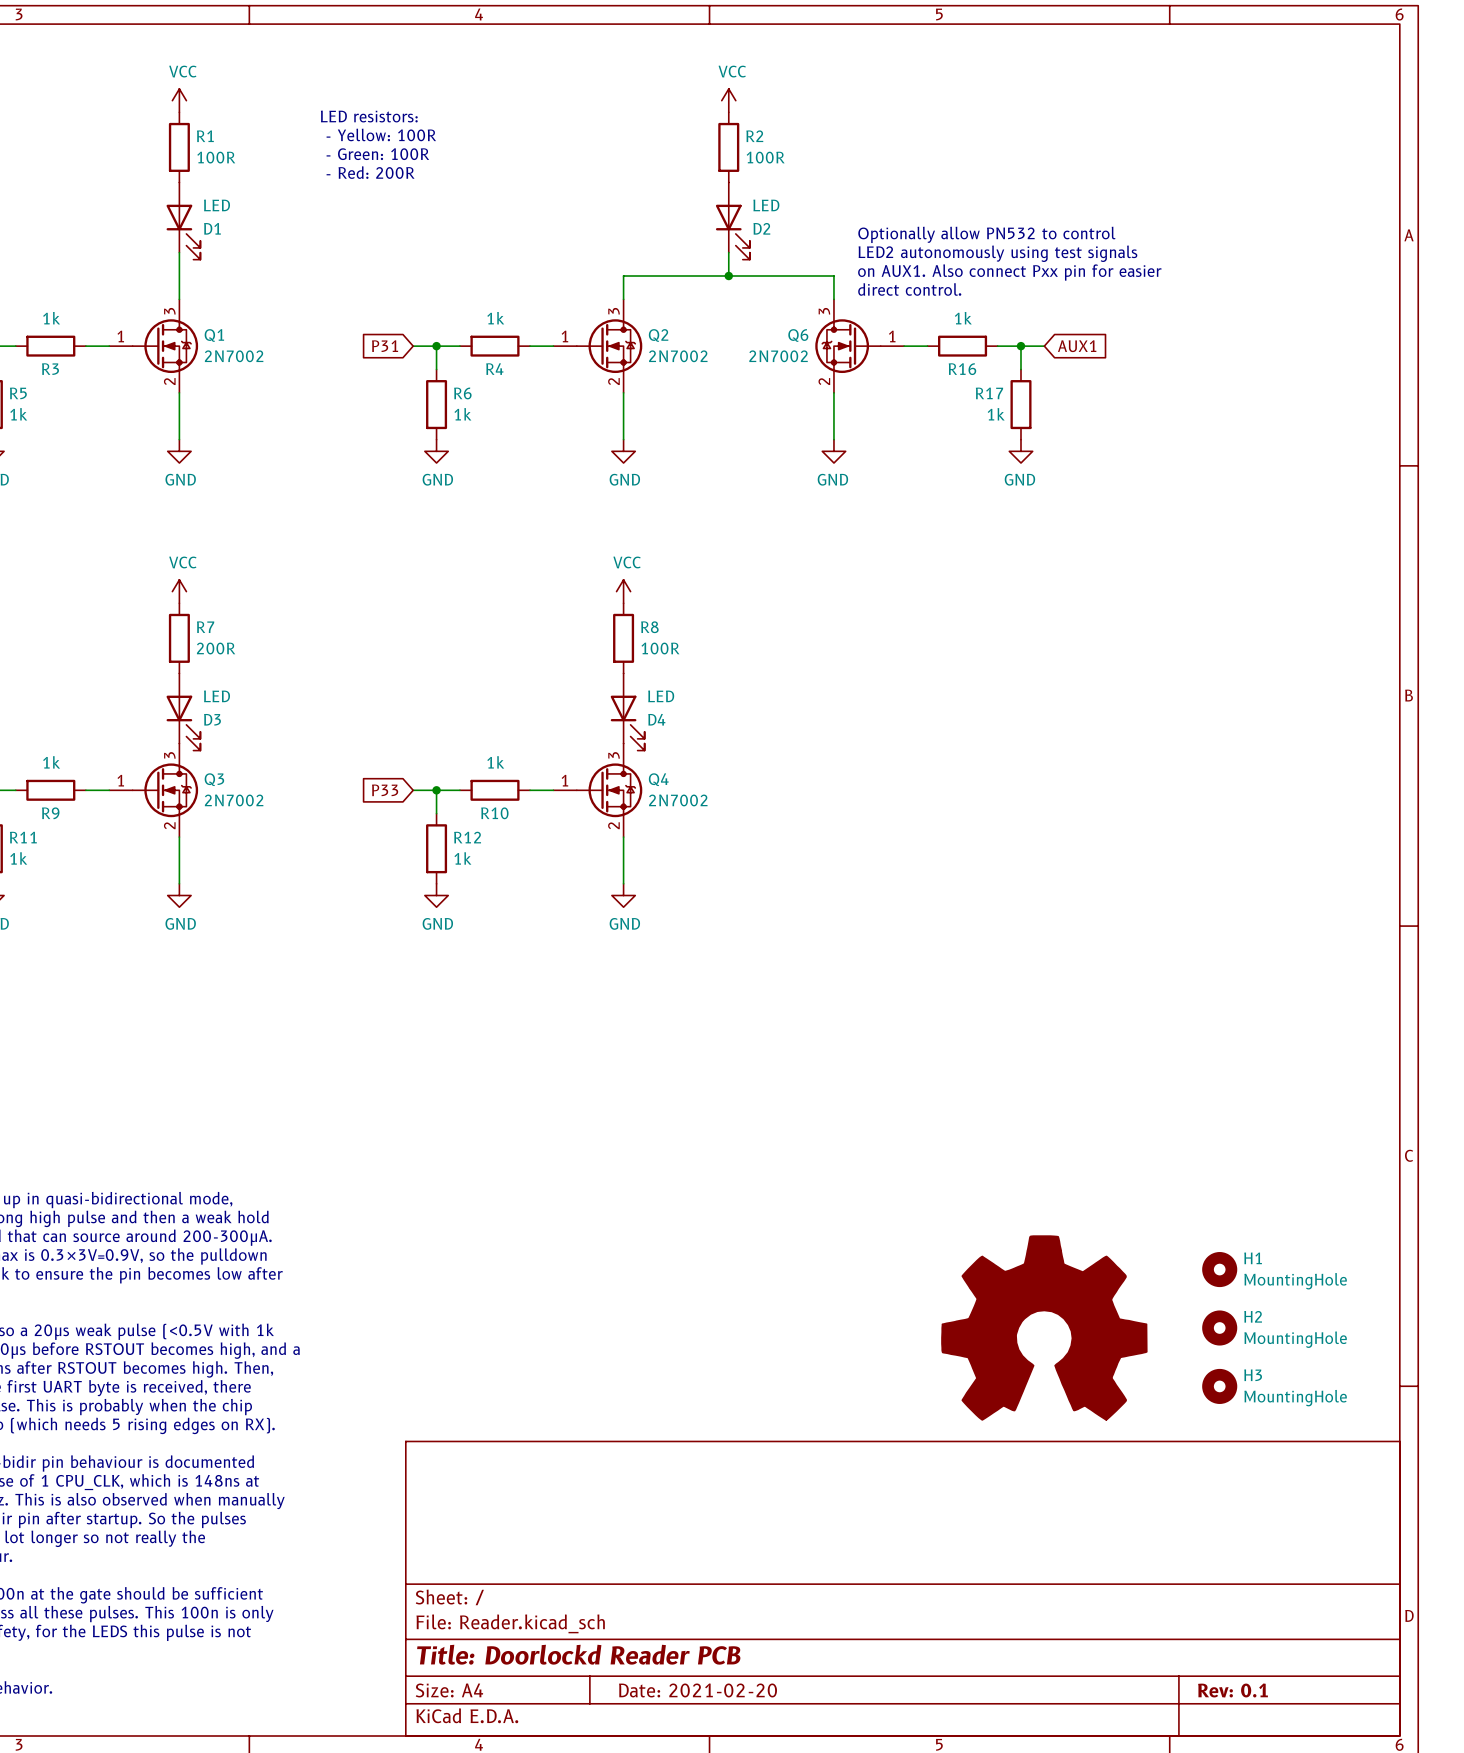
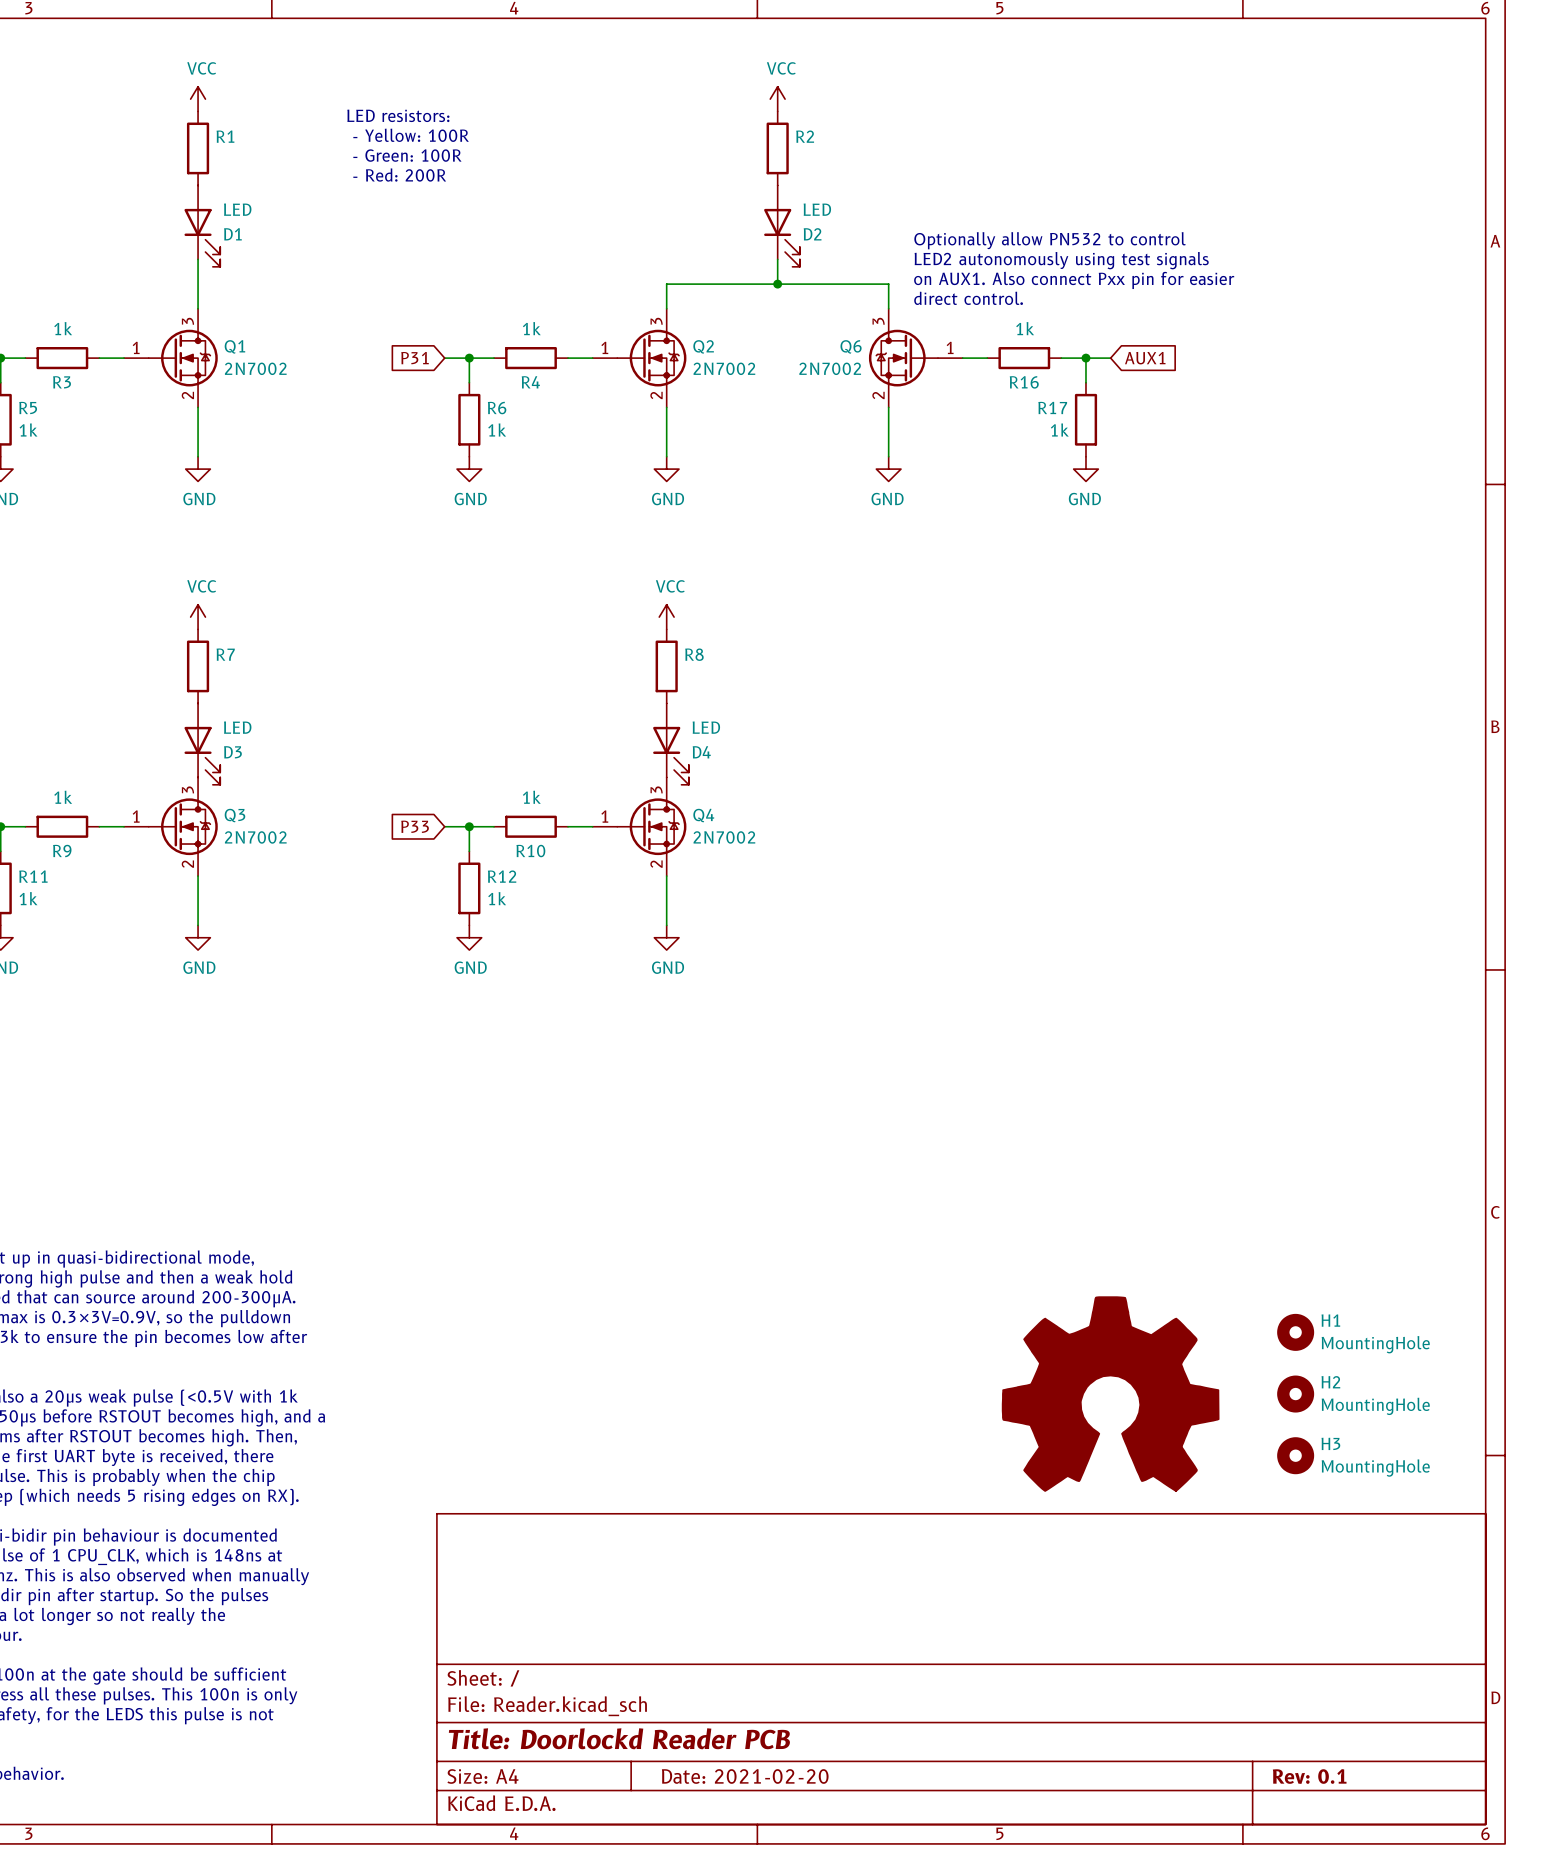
R1 value: 100R (216, 157) -> none
R2 value: 100R (765, 157) -> none
R7 value: 200R (216, 648) -> none
R8 value: 100R (660, 648) -> none

